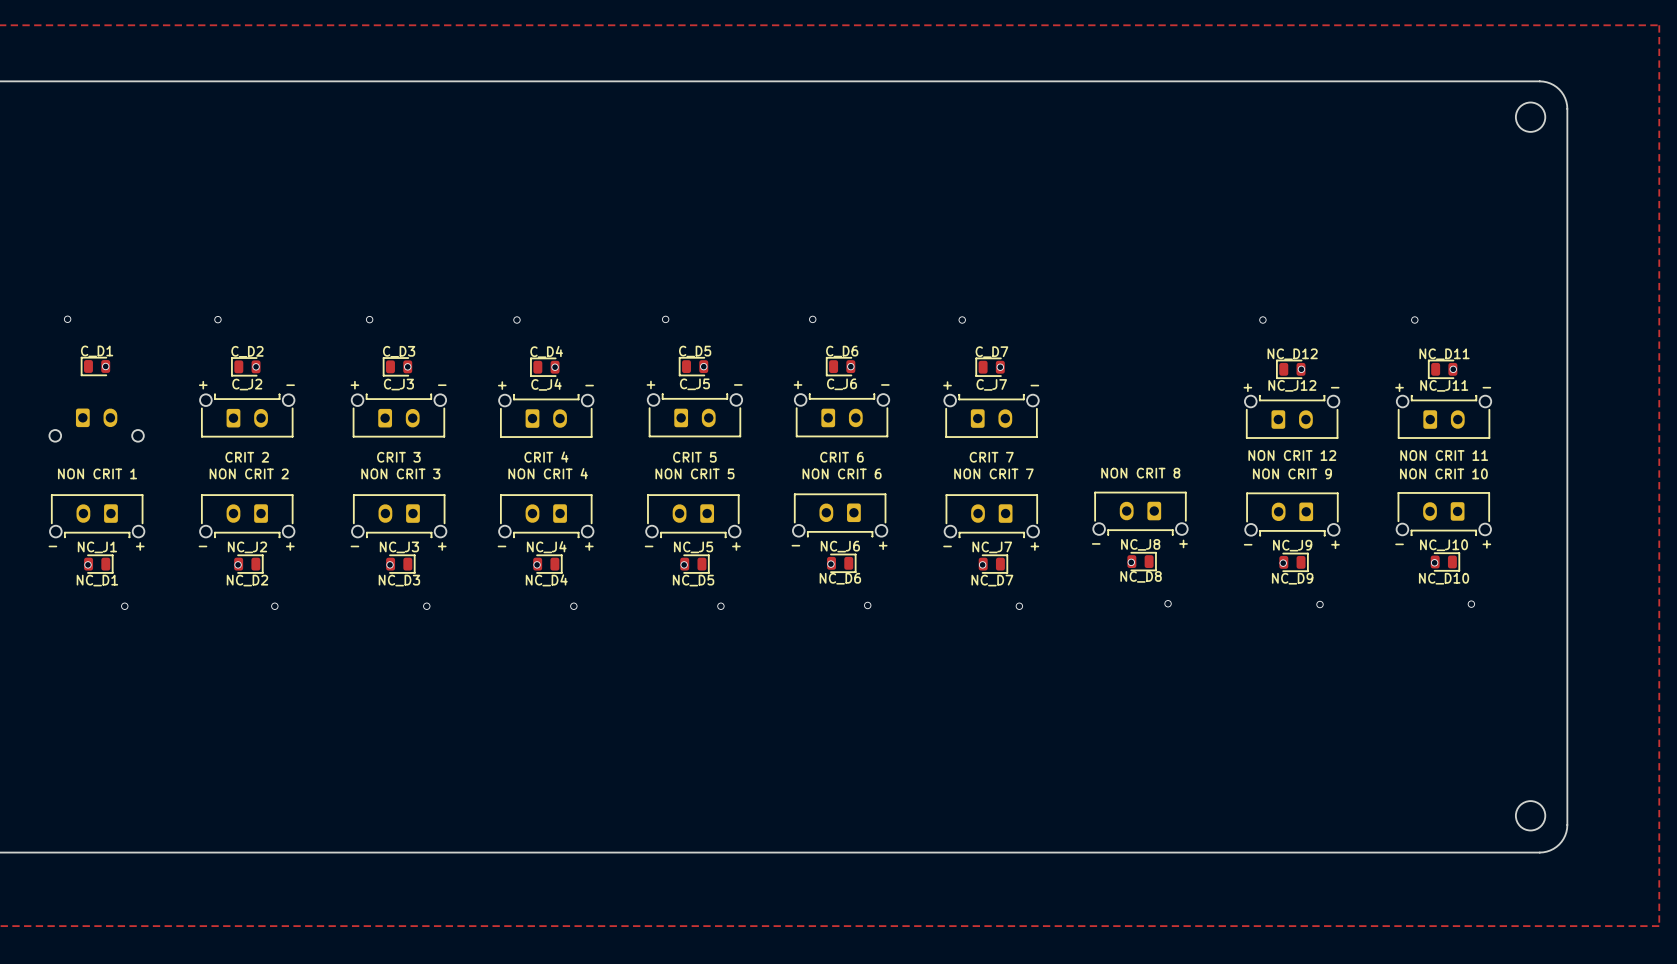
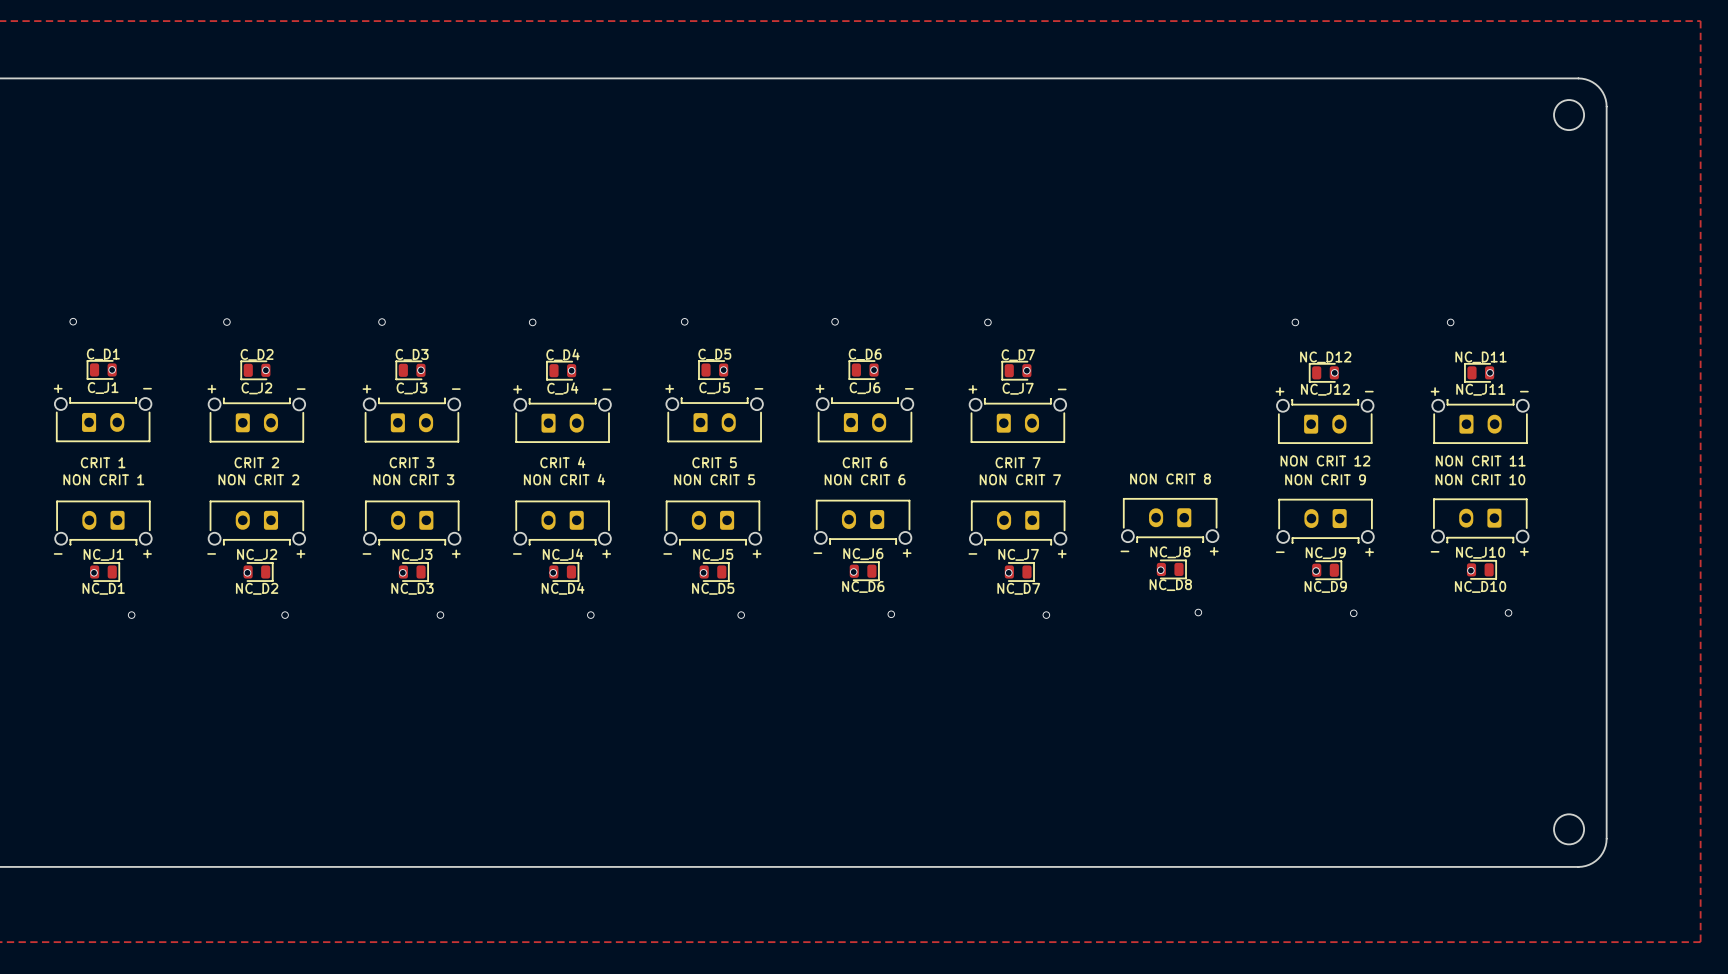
text: none -> + (58, 388)
text: none -> - (147, 388)
C_J1 side: bottom (96, 425) -> top (103, 419)
text: none -> CRIT 1 (103, 462)

